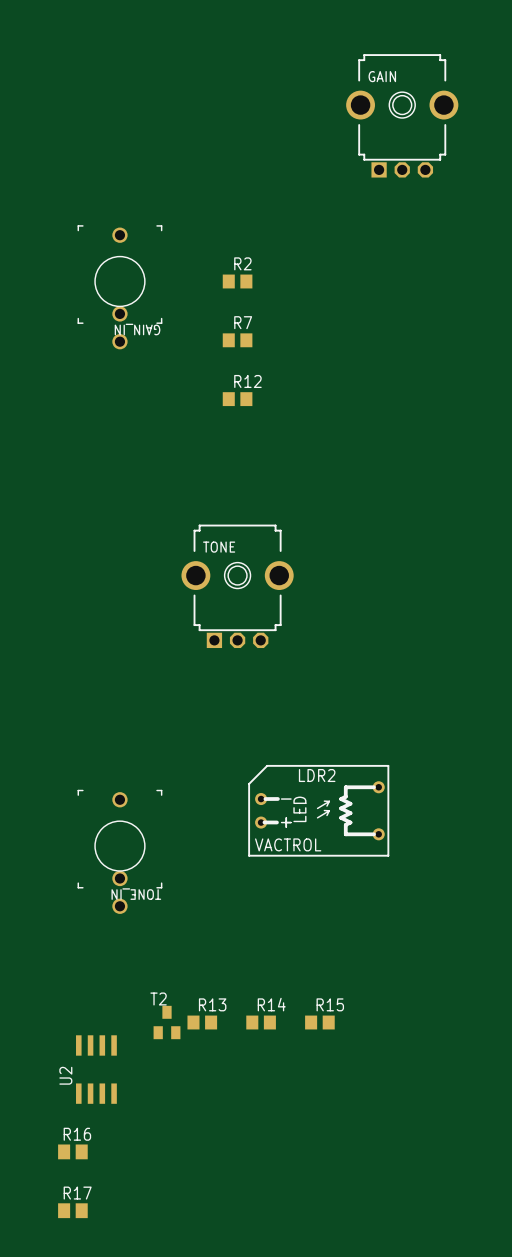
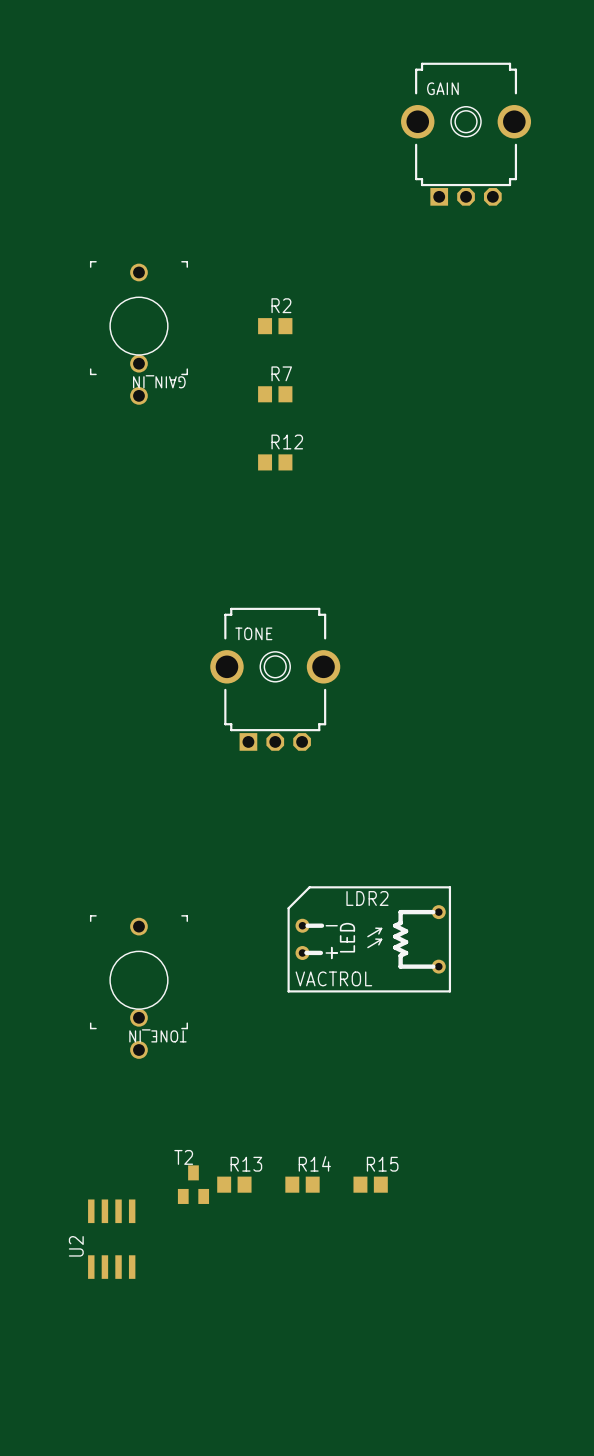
R16: (72, 1151) -> none
R17: (72, 1210) -> none

